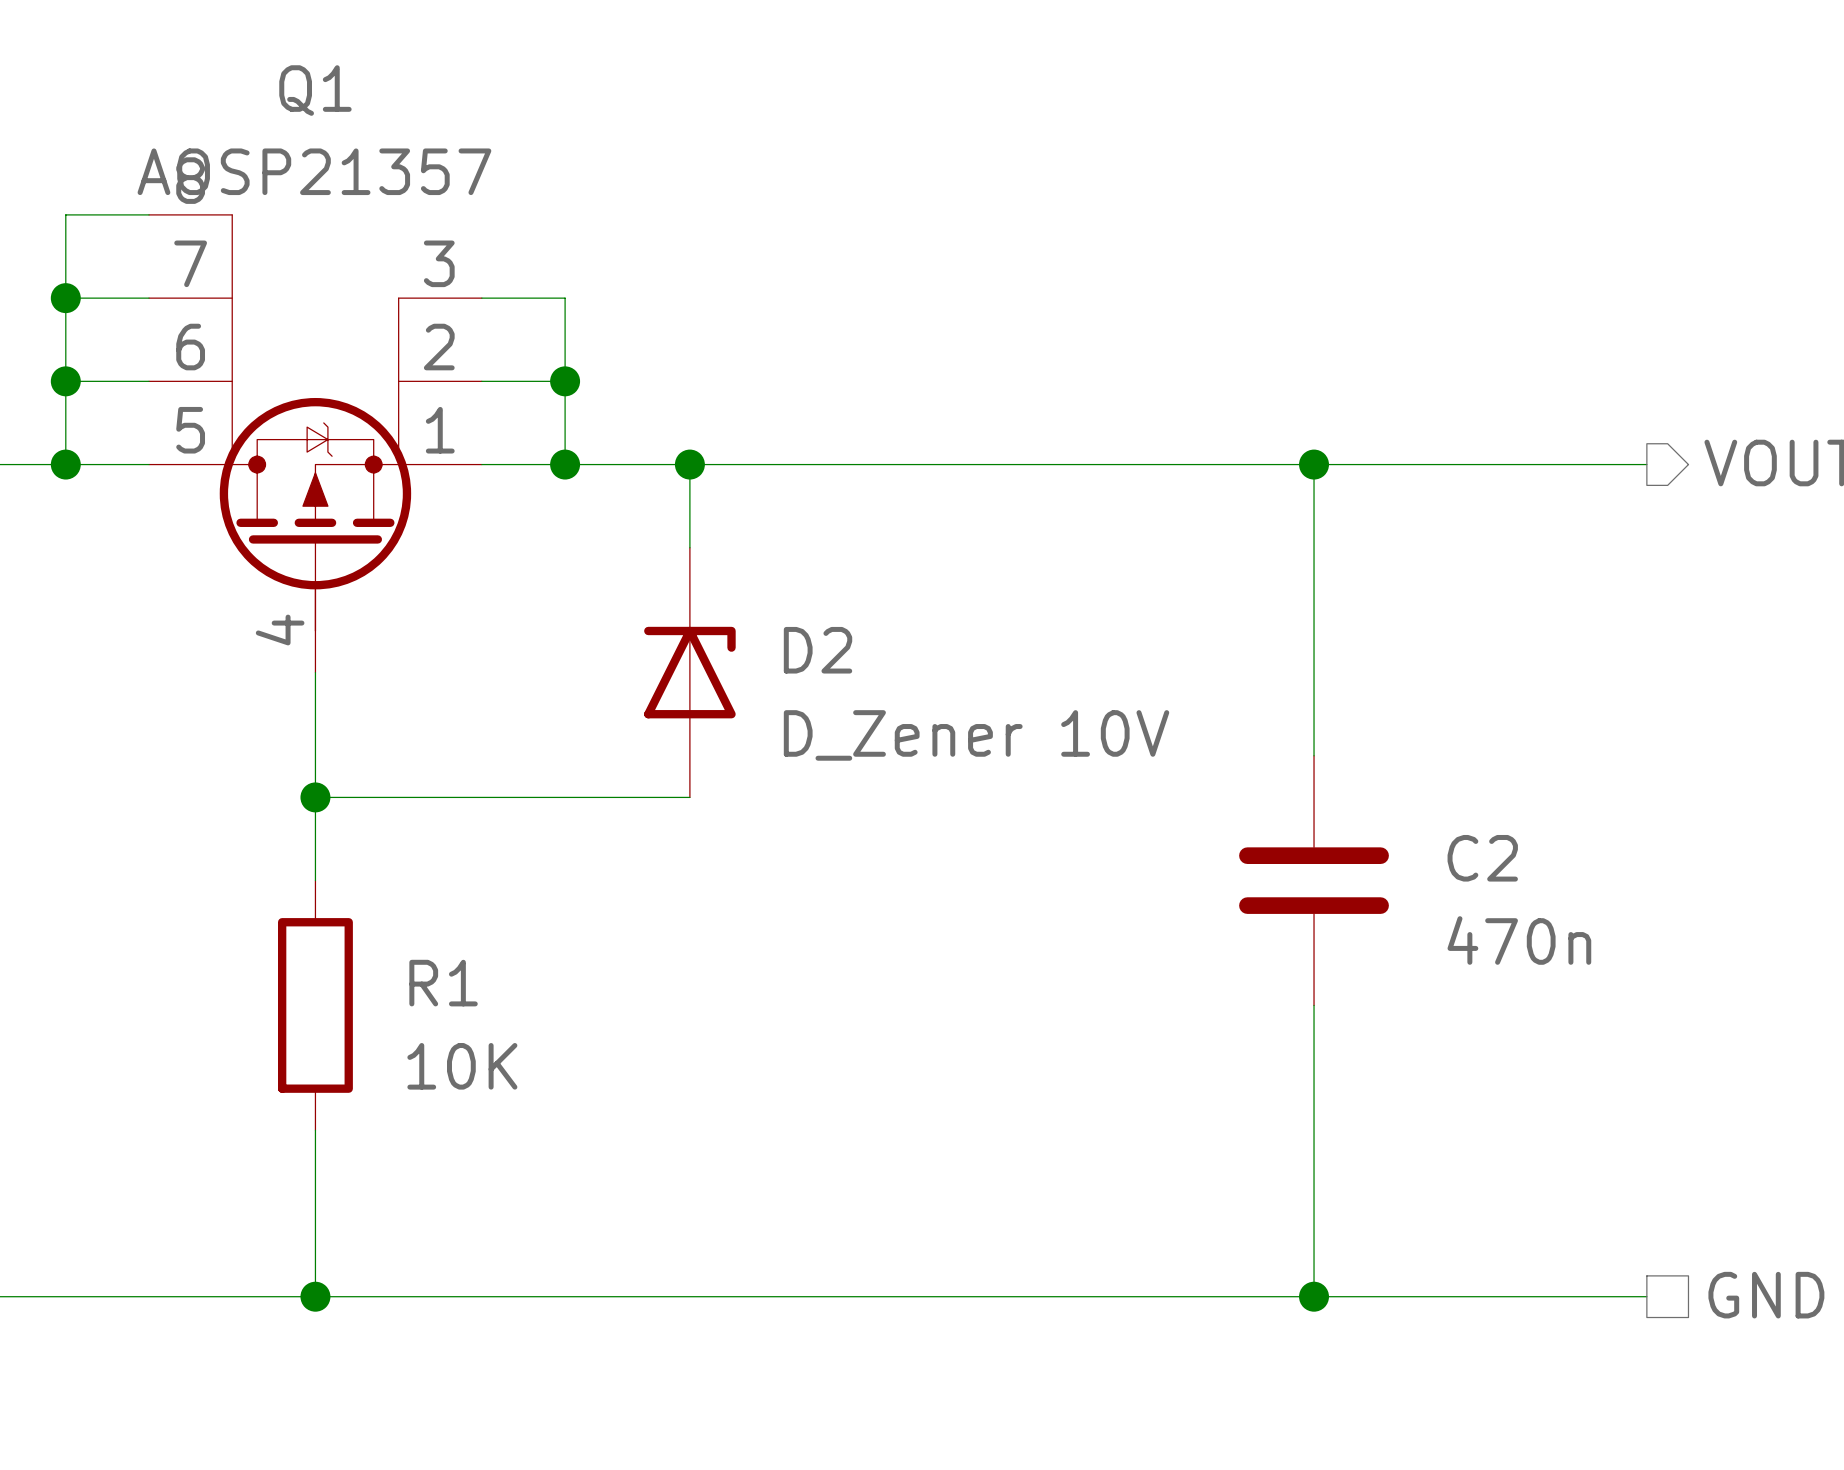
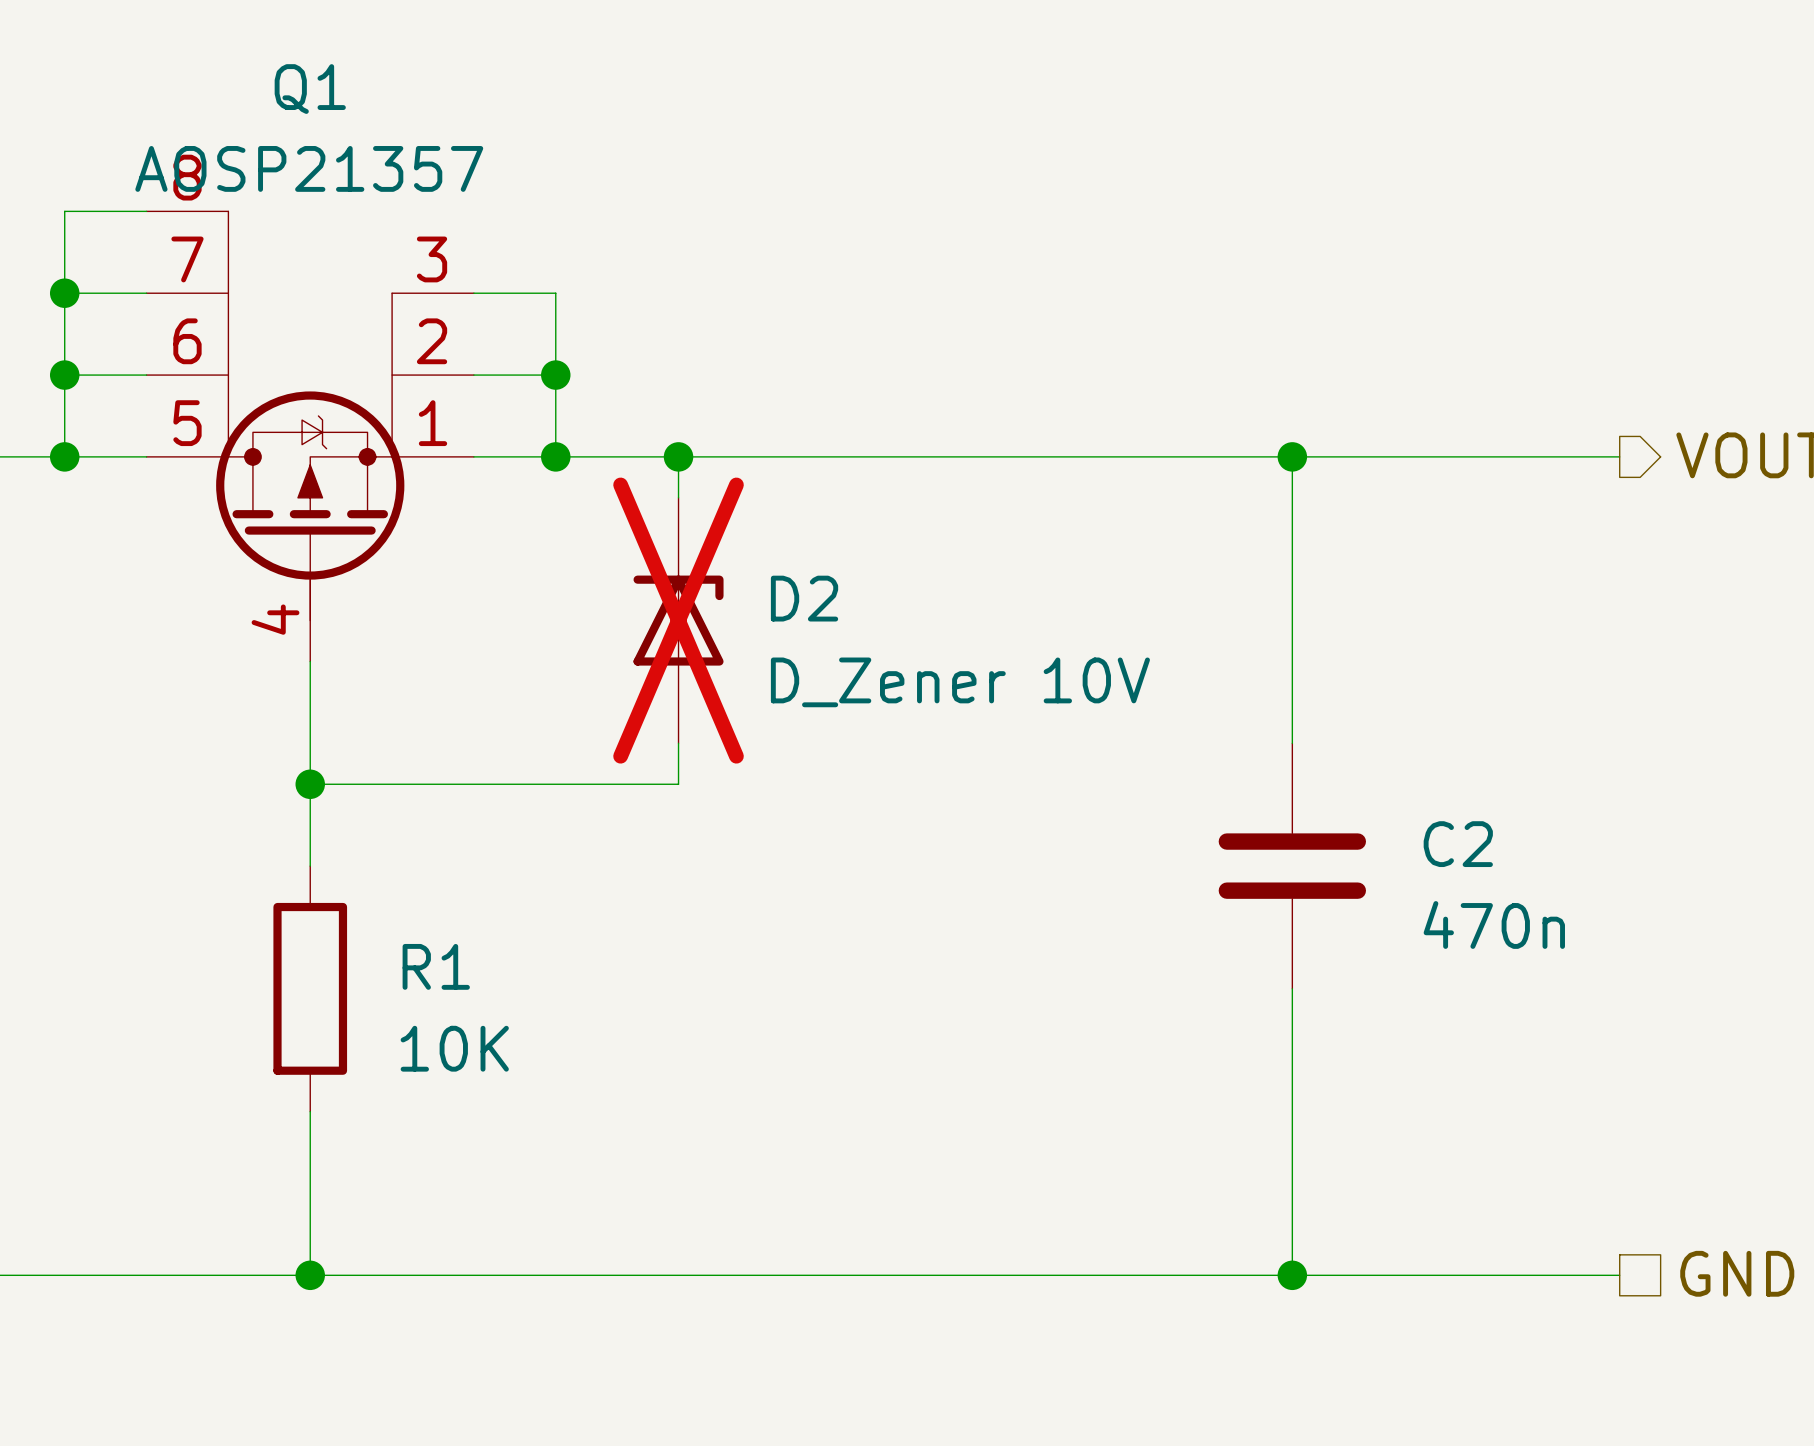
D2 do-not-place cross: none -> (678, 620)
D2 position: (689, 672) -> (678, 620)

